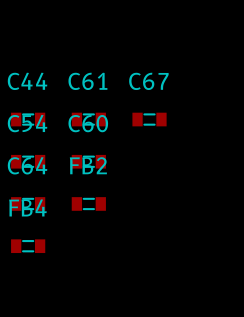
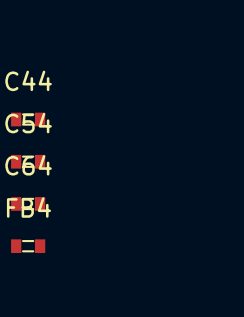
C61: (88, 119) -> none
C67: (149, 119) -> none
C60: (88, 161) -> none
FB2: (88, 203) -> none

